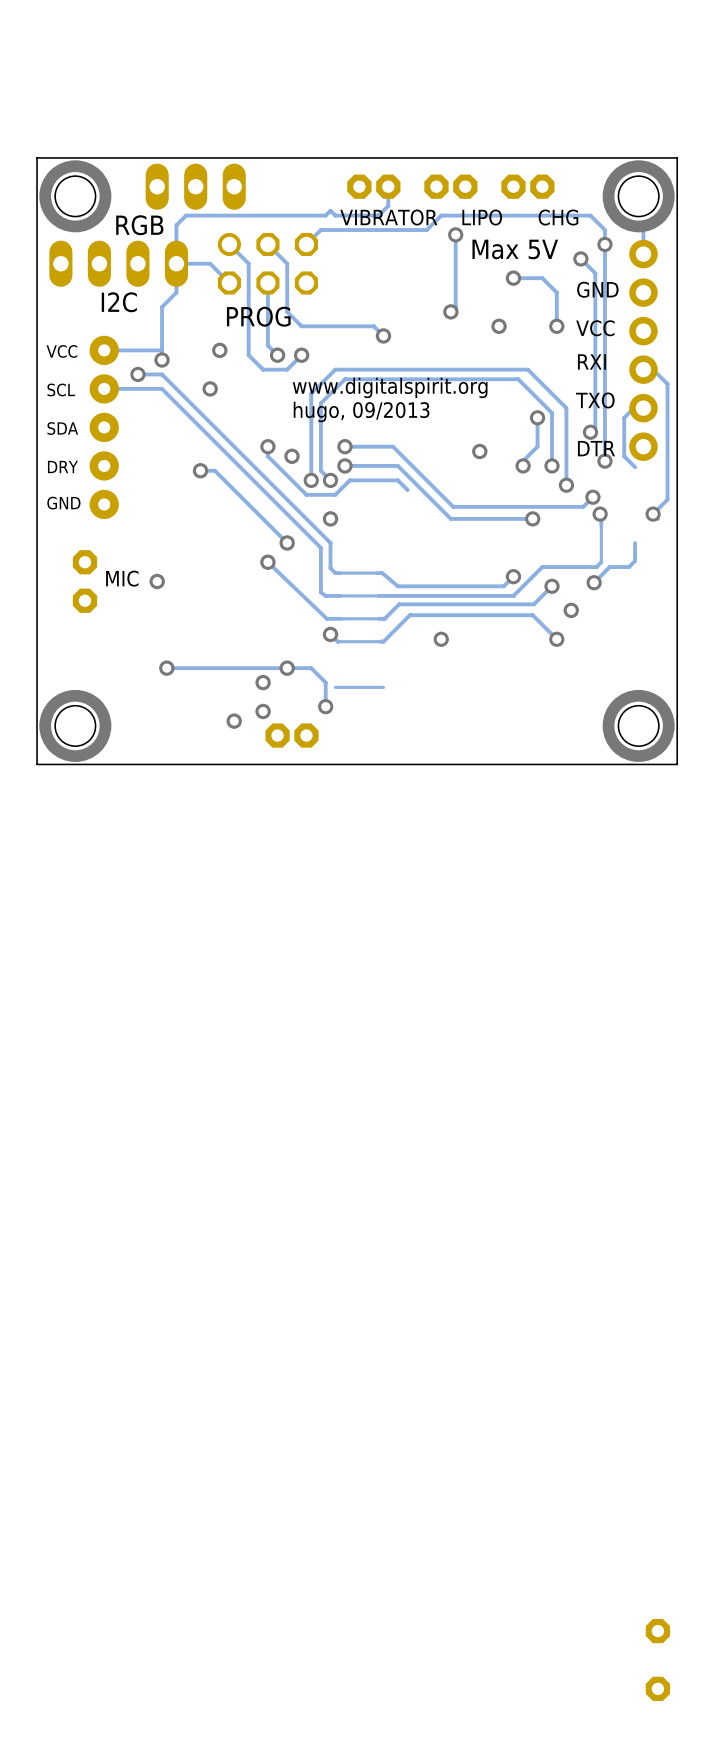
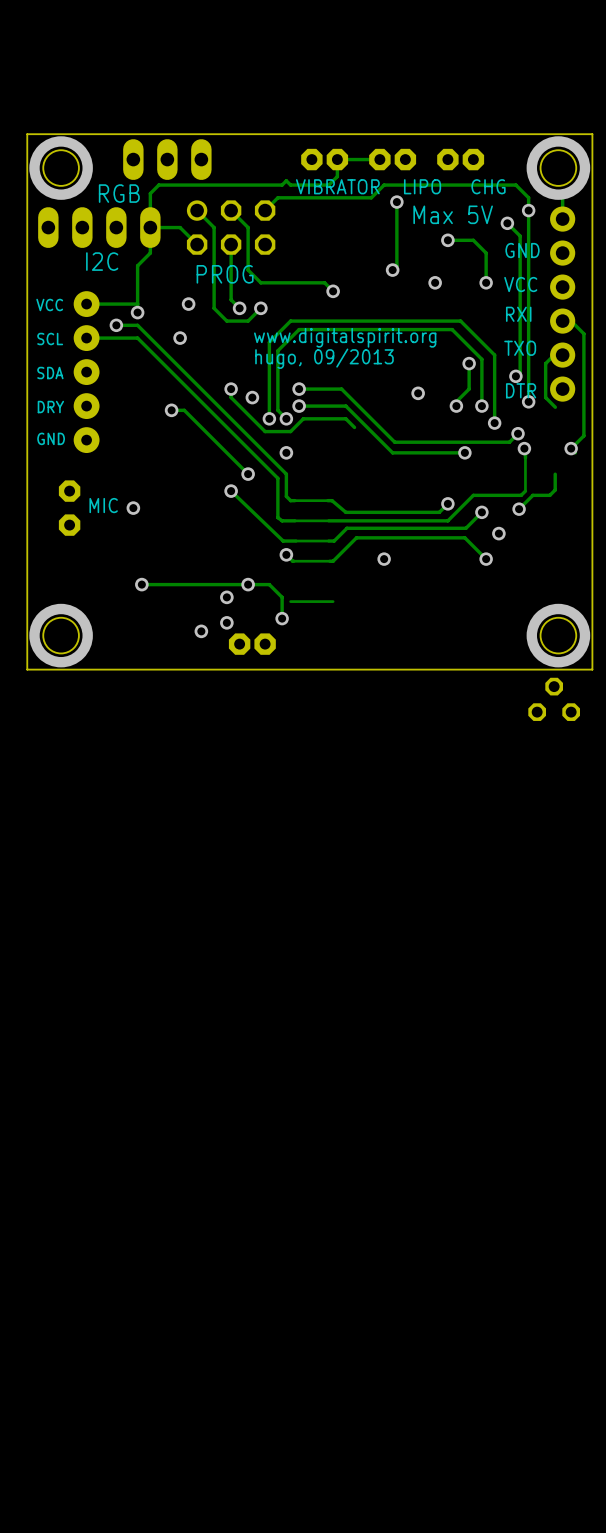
track: none -> (379, 159) (337, 159)
part: none -> (554, 699)
part: (657, 1631) -> none
part: (657, 1688) -> none

